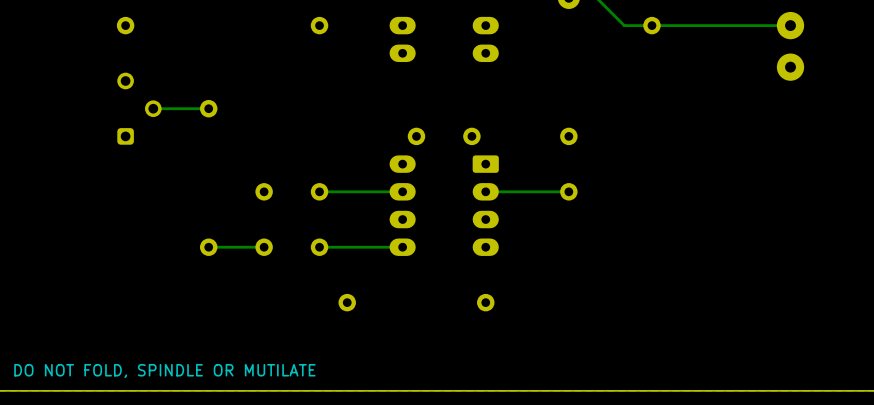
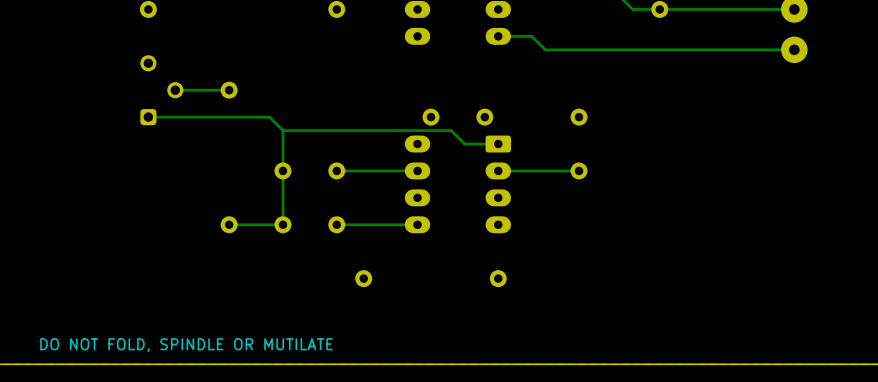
track: none -> (498, 36) (531, 36) (545, 49) (794, 49)
track: none -> (148, 117) (269, 117) (282, 130)
track: none -> (282, 130) (282, 224)
track: none -> (282, 130) (451, 130) (464, 144) (498, 144)

